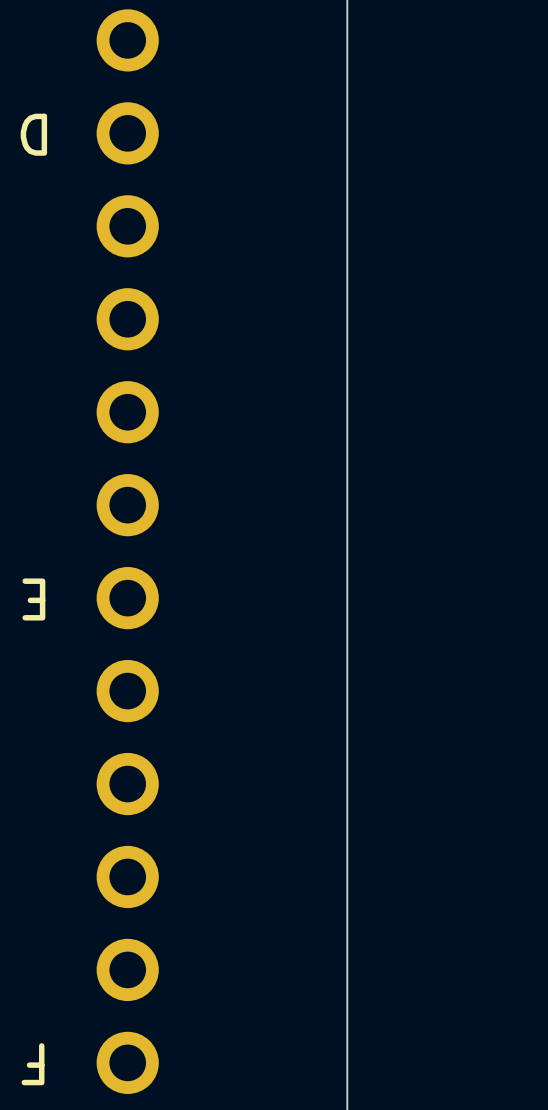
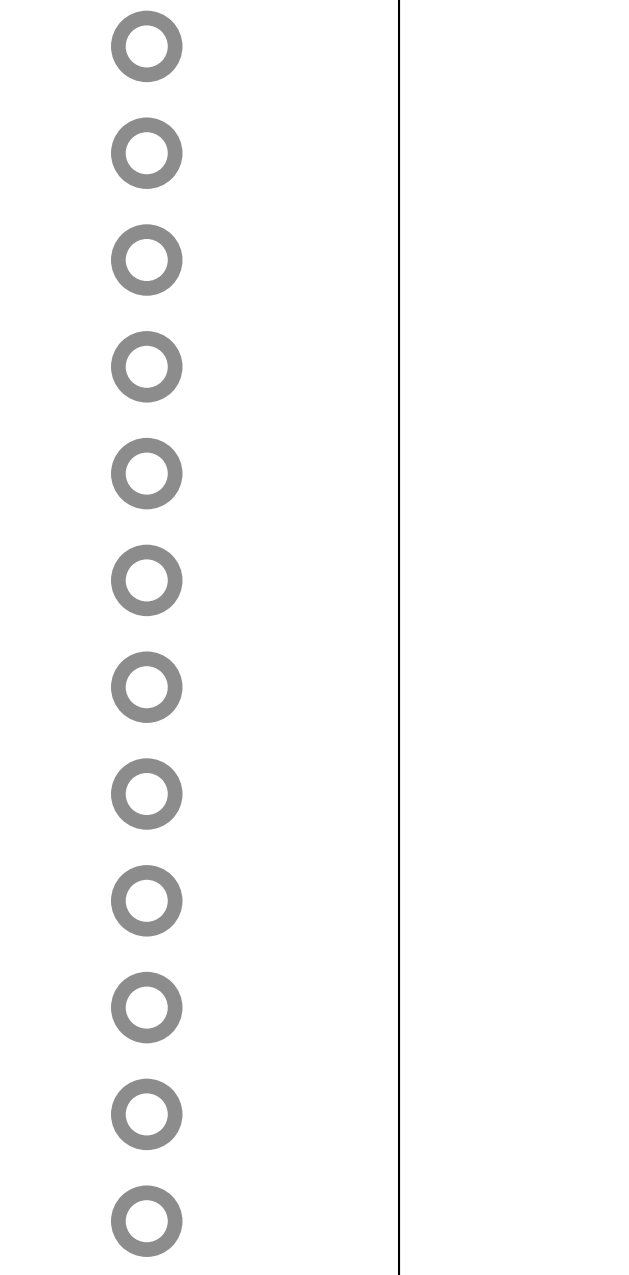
text: D (33, 134) -> none
text: E (33, 599) -> none
text: F (33, 1064) -> none

